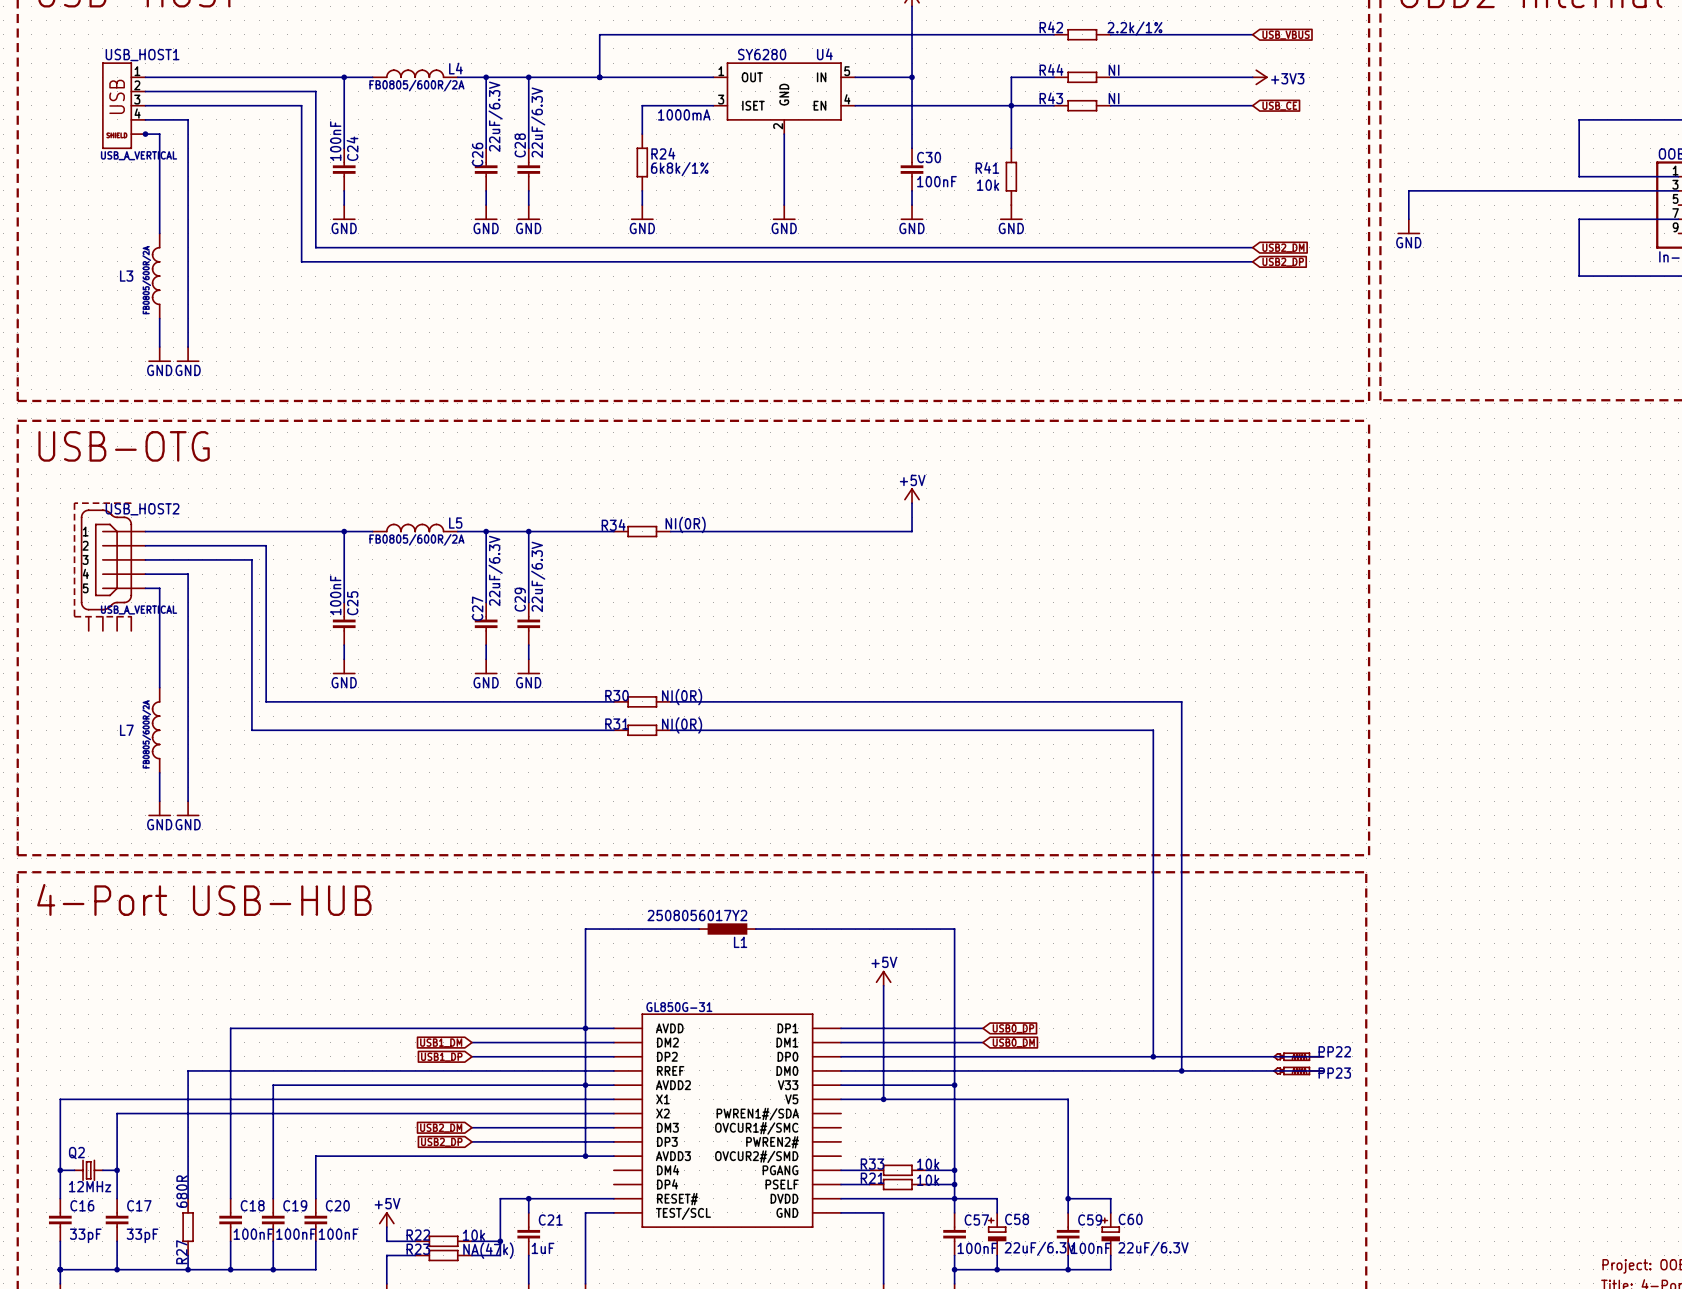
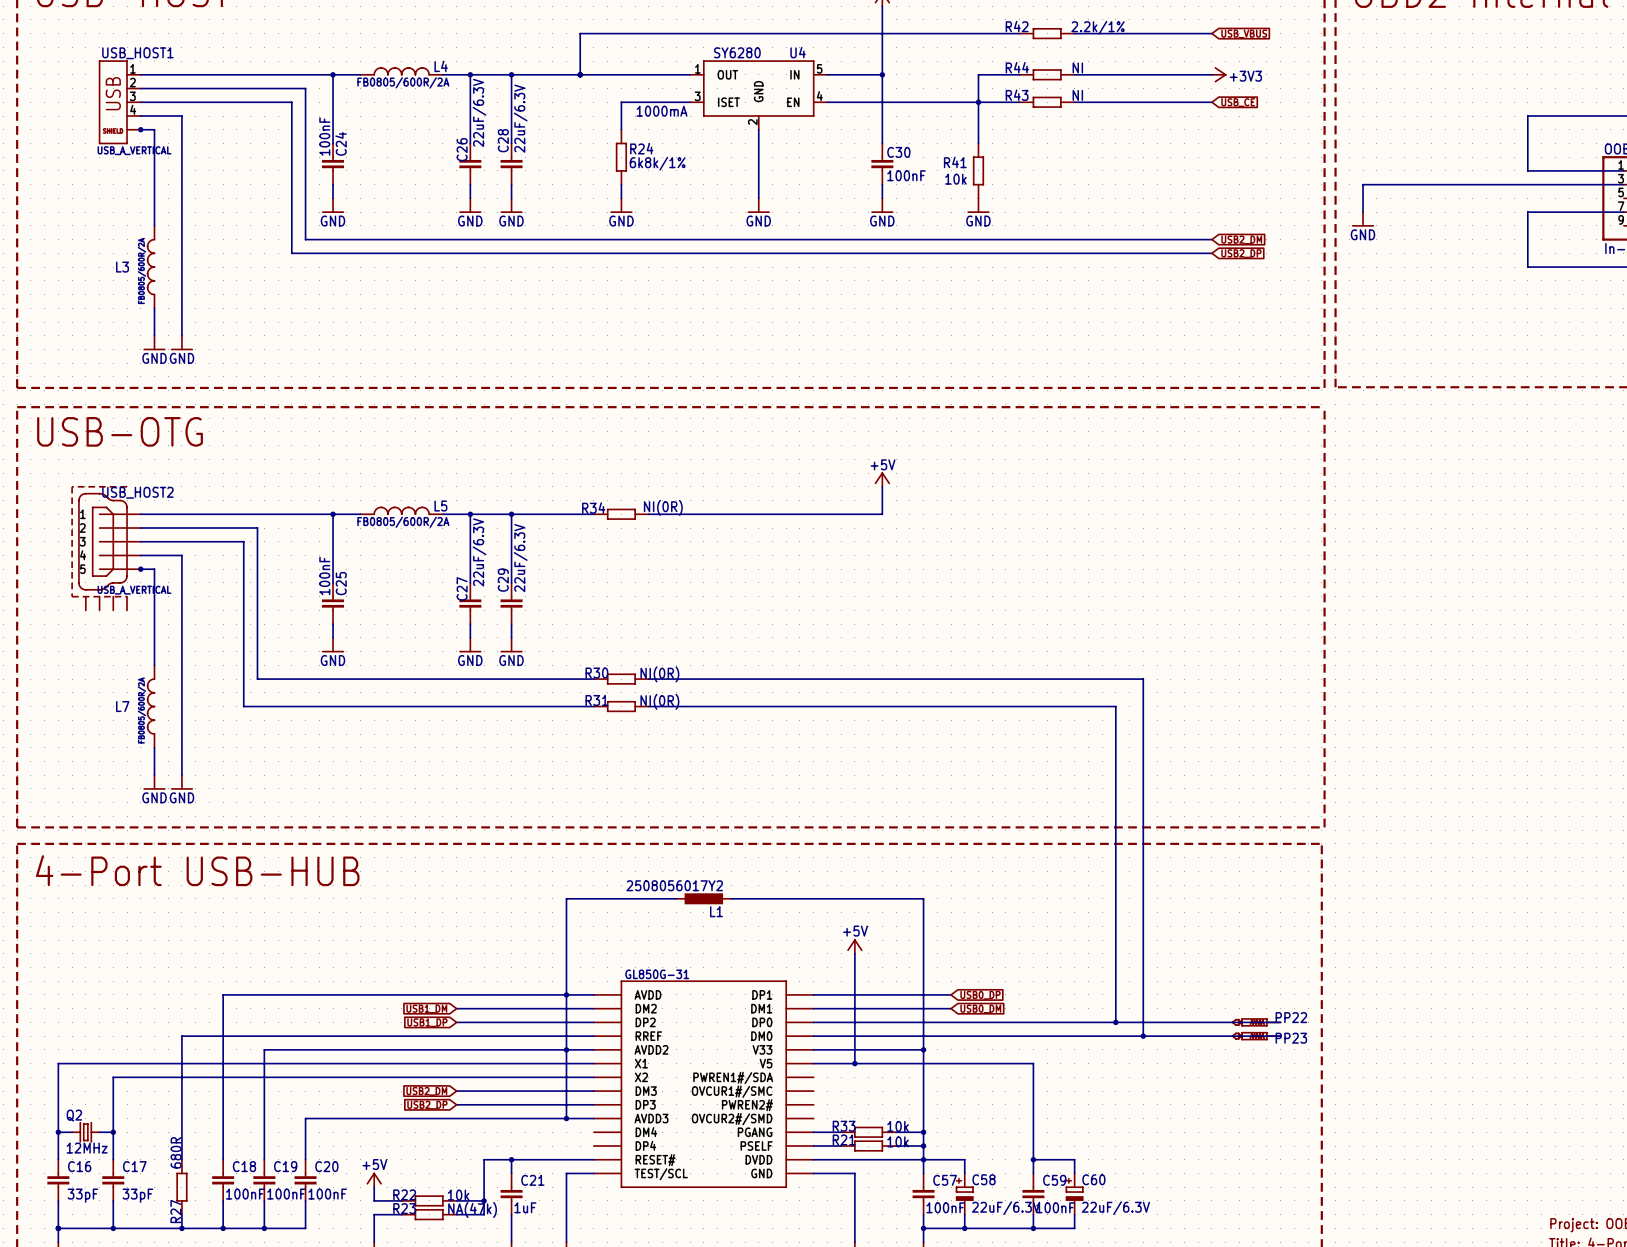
junction: none -> (140, 569)

